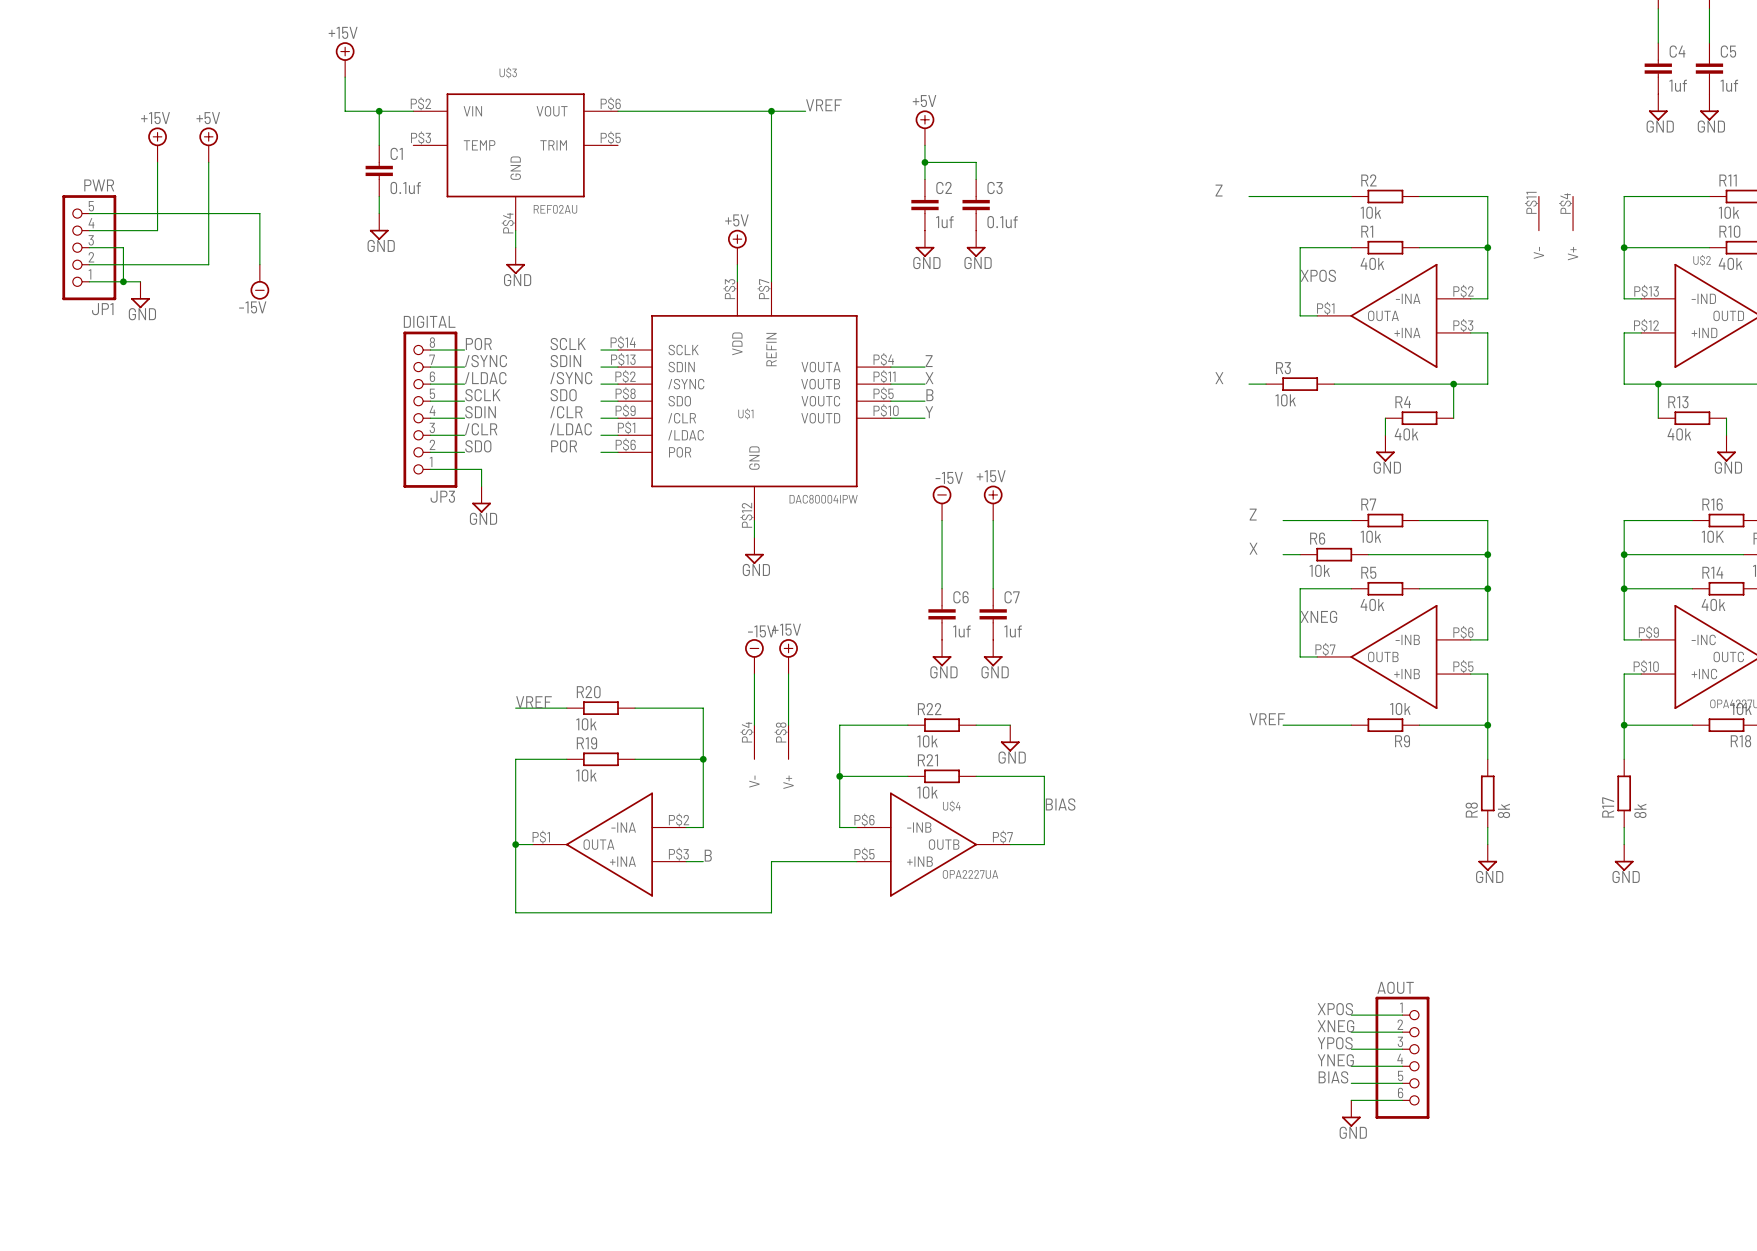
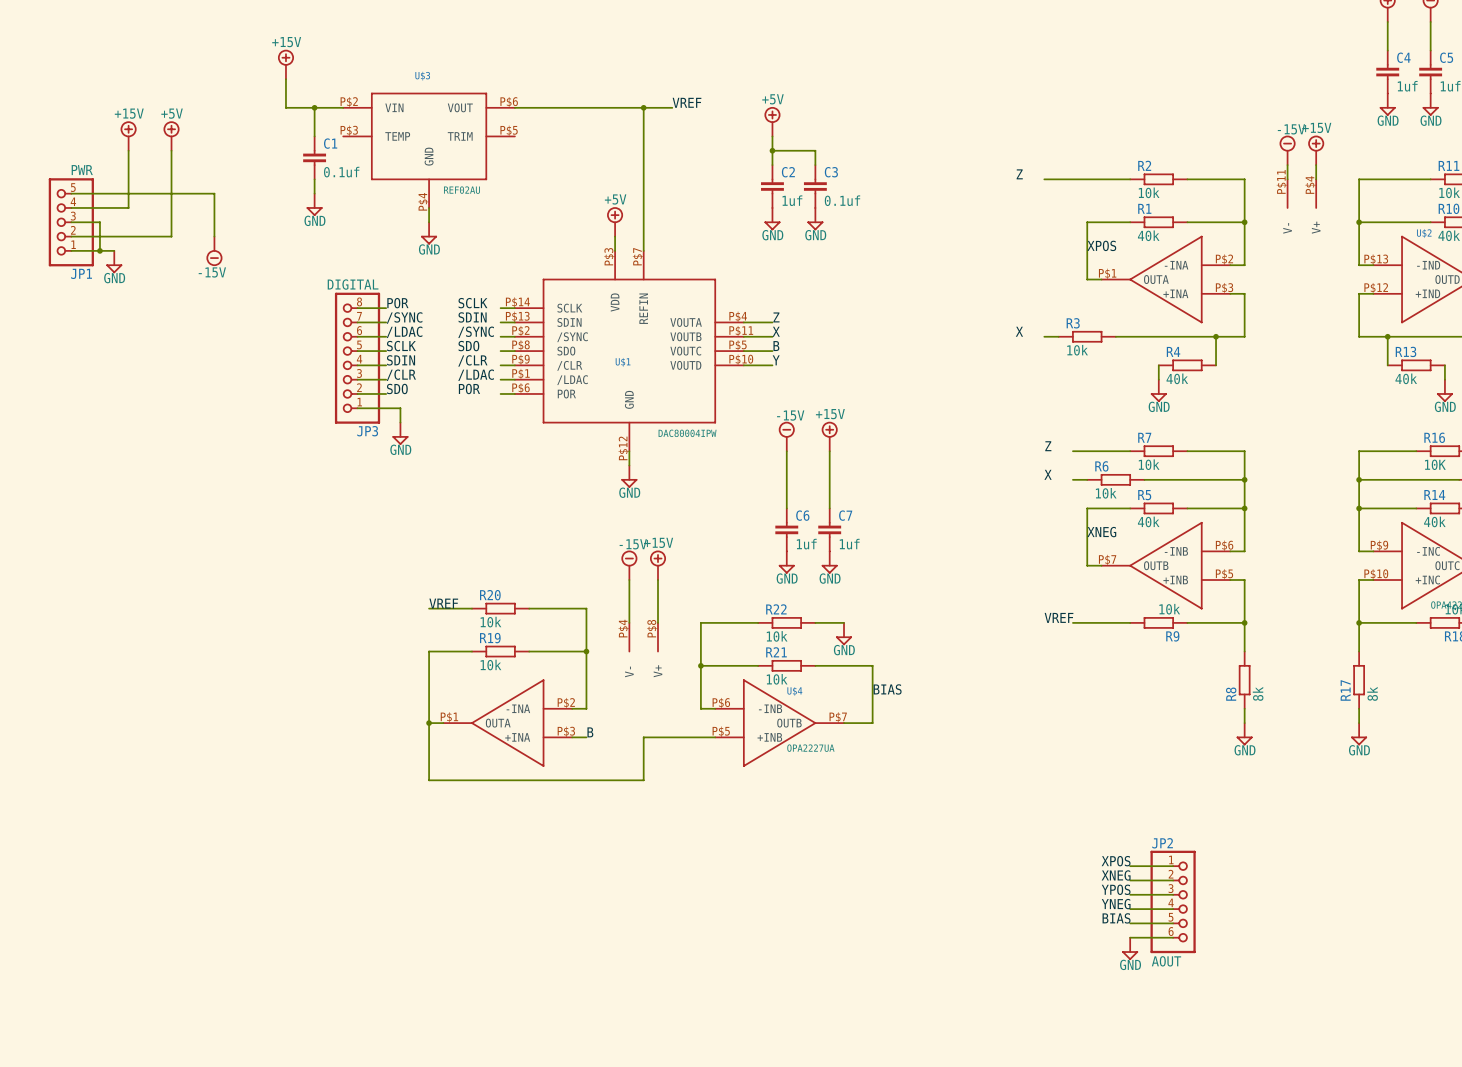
power symbol: none -> -15V (1287, 150)
power symbol: none -> +15V (1316, 150)
wire: none -> (1287, 165) (1287, 179)
wire: none -> (1316, 165) (1316, 179)
AOUT name: AOUT (1395, 987) -> JP2 (1162, 843)
AOUT value: none -> AOUT (1166, 961)

